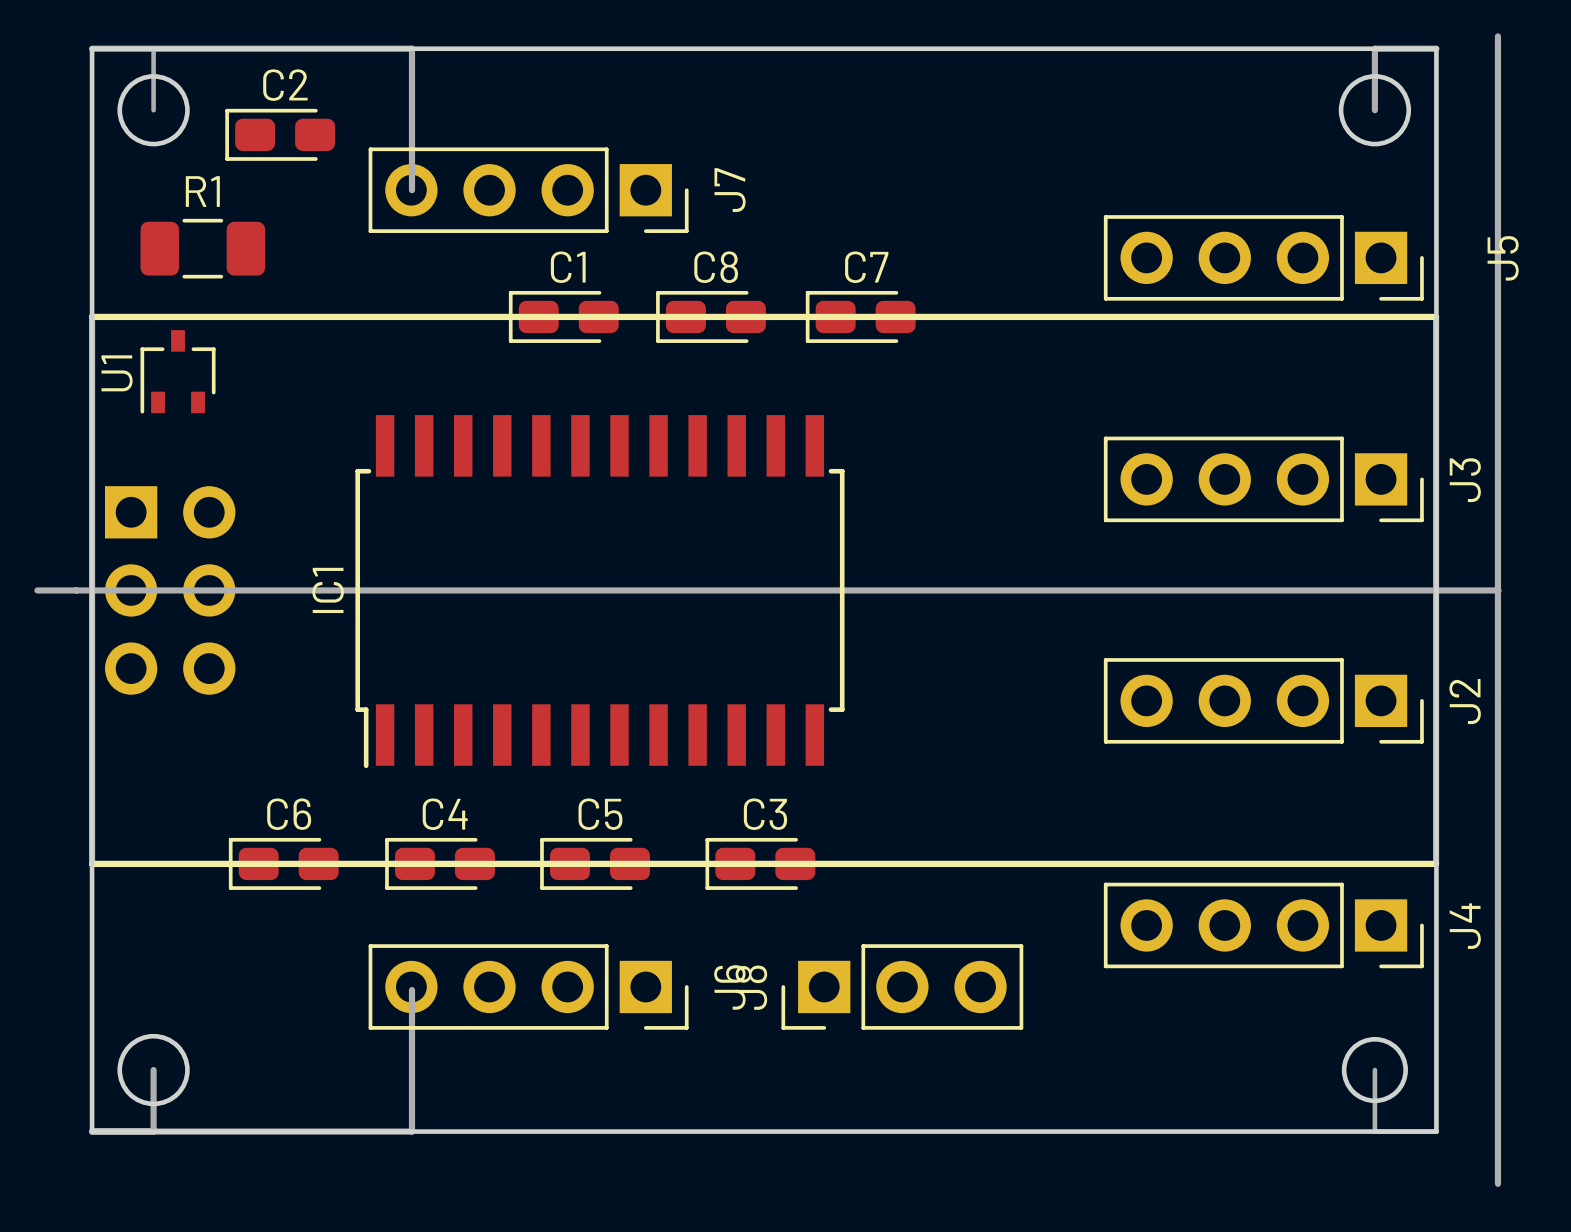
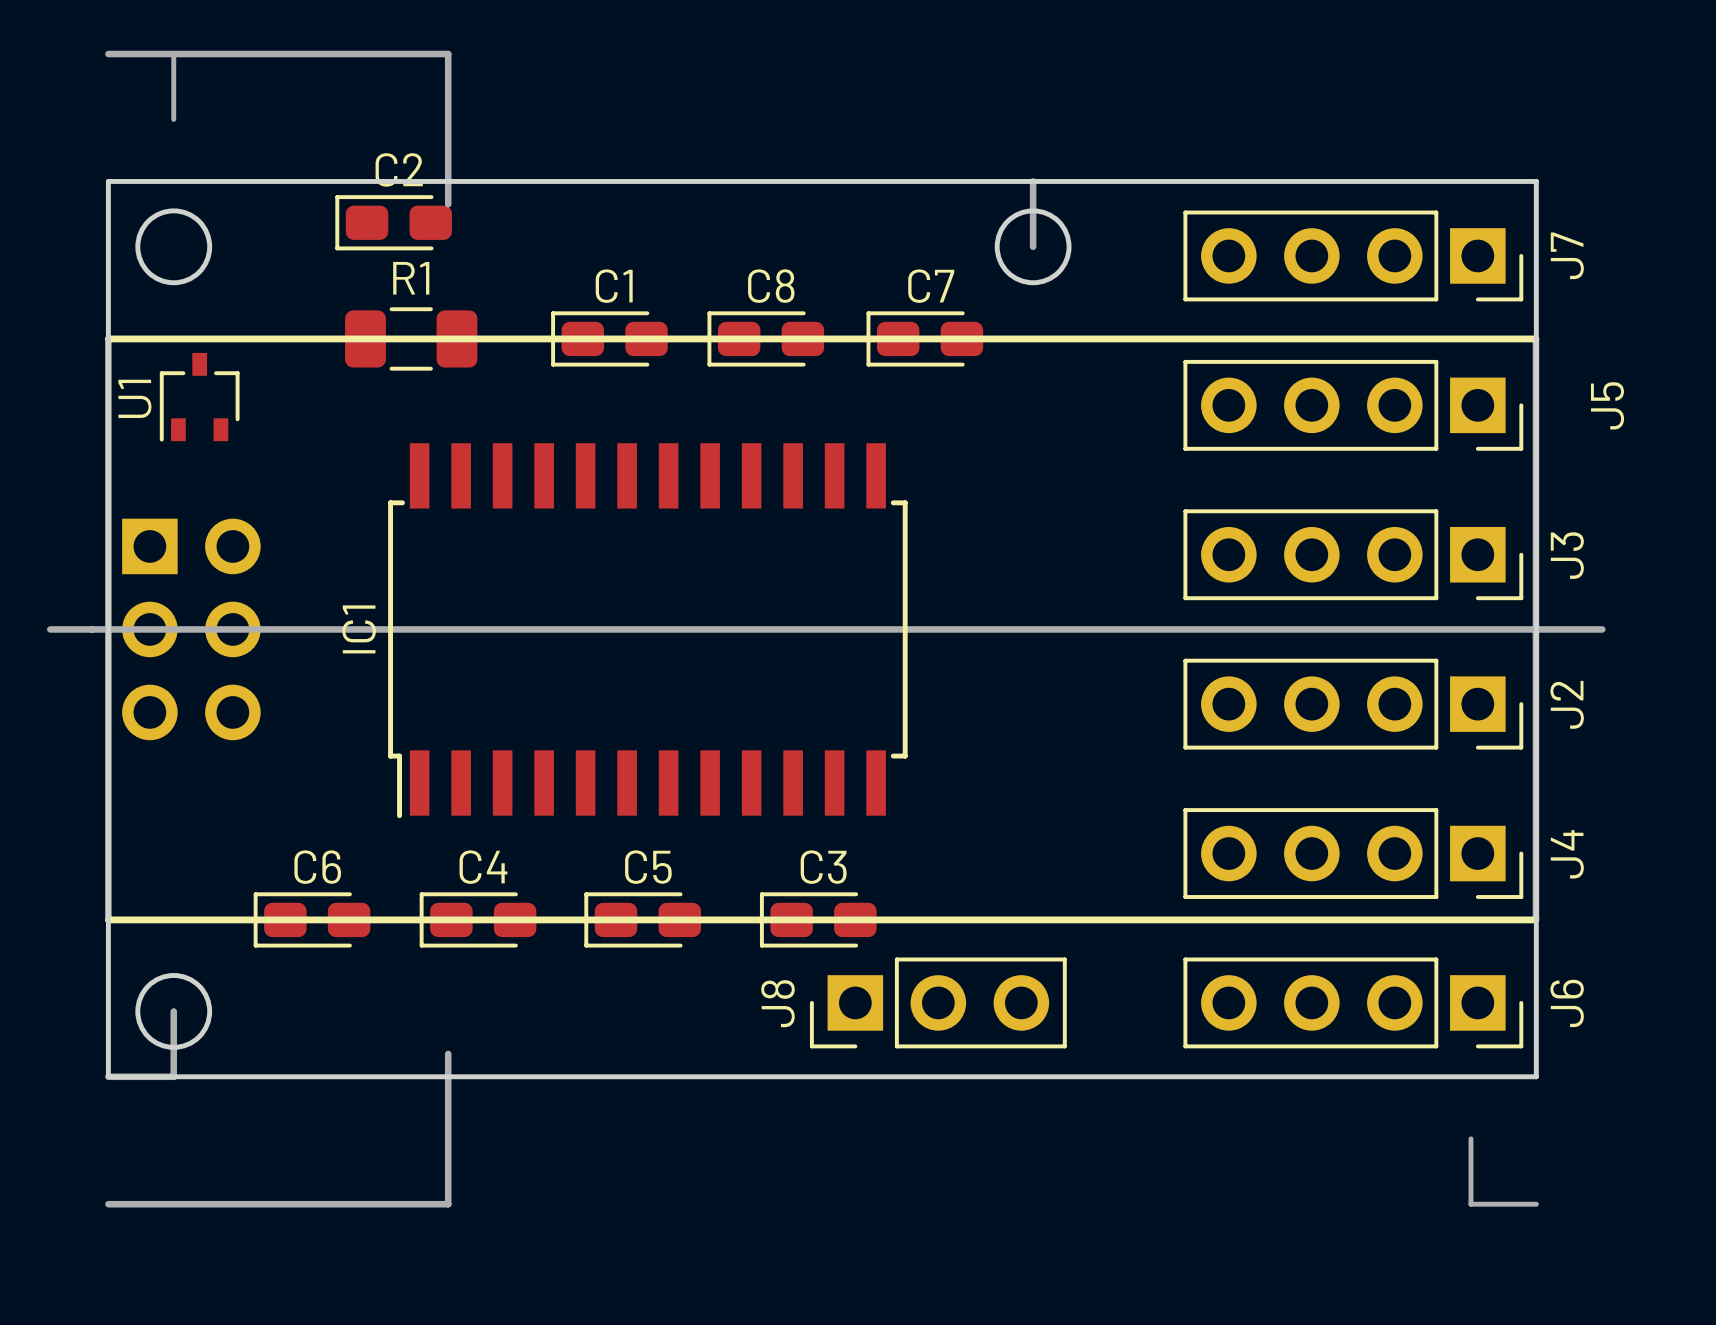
line: (1497, 36) (1497, 1183) -> none
line: (1436, 48) (1374, 48) (1374, 110) -> none
round board edge: [1338, 74, 1412, 147] -> none
round board edge position: (153, 110) -> (173, 246)
C2 position: (280, 134) -> (393, 222)
board edge: (92, 168) (92, 48) (1436, 48) (1436, 168) -> (108, 181) (1536, 181)
line: none -> (1033, 181) (1033, 246)
J7 position: (528, 190) -> (1353, 255)
round board edge: none -> [994, 208, 1072, 286]
R1 position: (202, 248) -> (411, 338)
J5 position: (1263, 257) -> (1353, 405)
J3 position: (1263, 479) -> (1353, 554)
J2 position: (1263, 700) -> (1353, 704)
J4 position: (1263, 925) -> (1353, 853)
line: none -> (173, 1011) (173, 1076) (108, 1076)
J6 position: (528, 986) -> (1353, 1002)
J8 position: (902, 986) -> (938, 1002)
board edge: (92, 1011) (92, 1131) (1436, 1131) (1436, 1011) -> (108, 1076) (1536, 1076)
round board edge: [1341, 1036, 1408, 1104] -> none
line: (153, 1070) (153, 1131) -> none
round board edge position: (153, 1070) -> (173, 1011)

